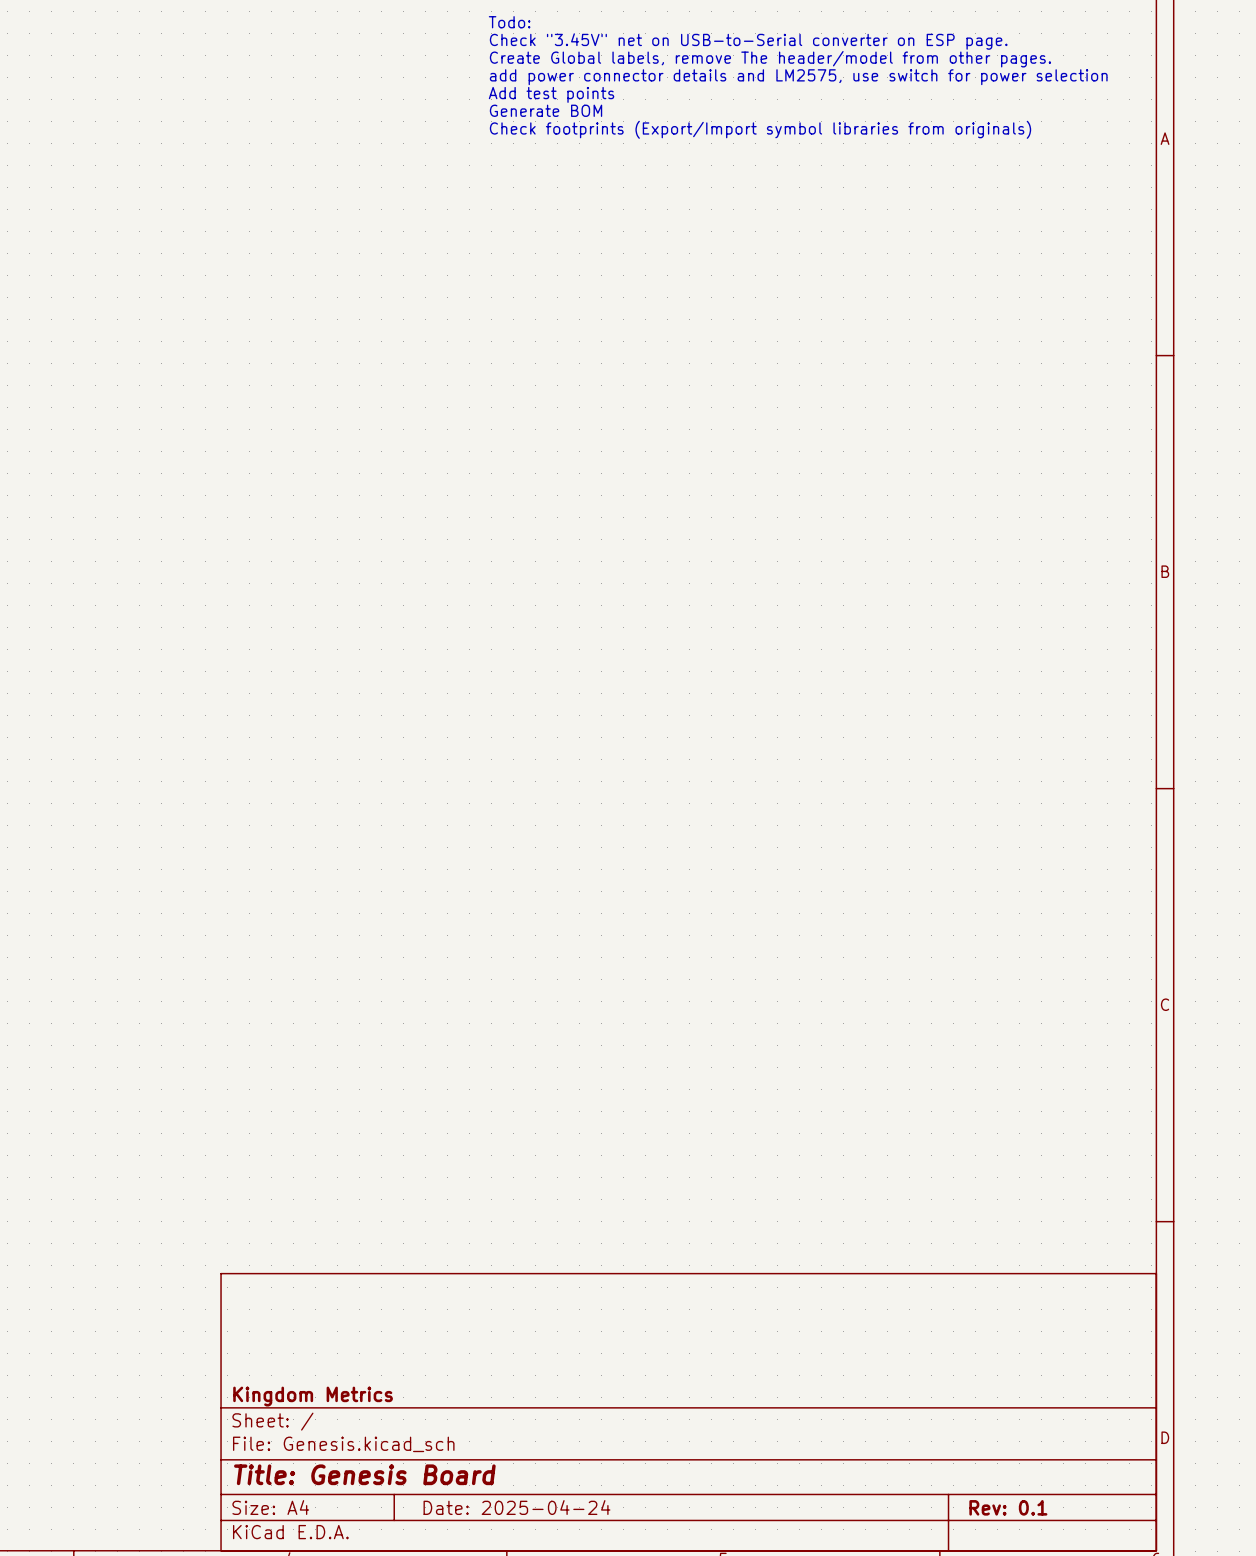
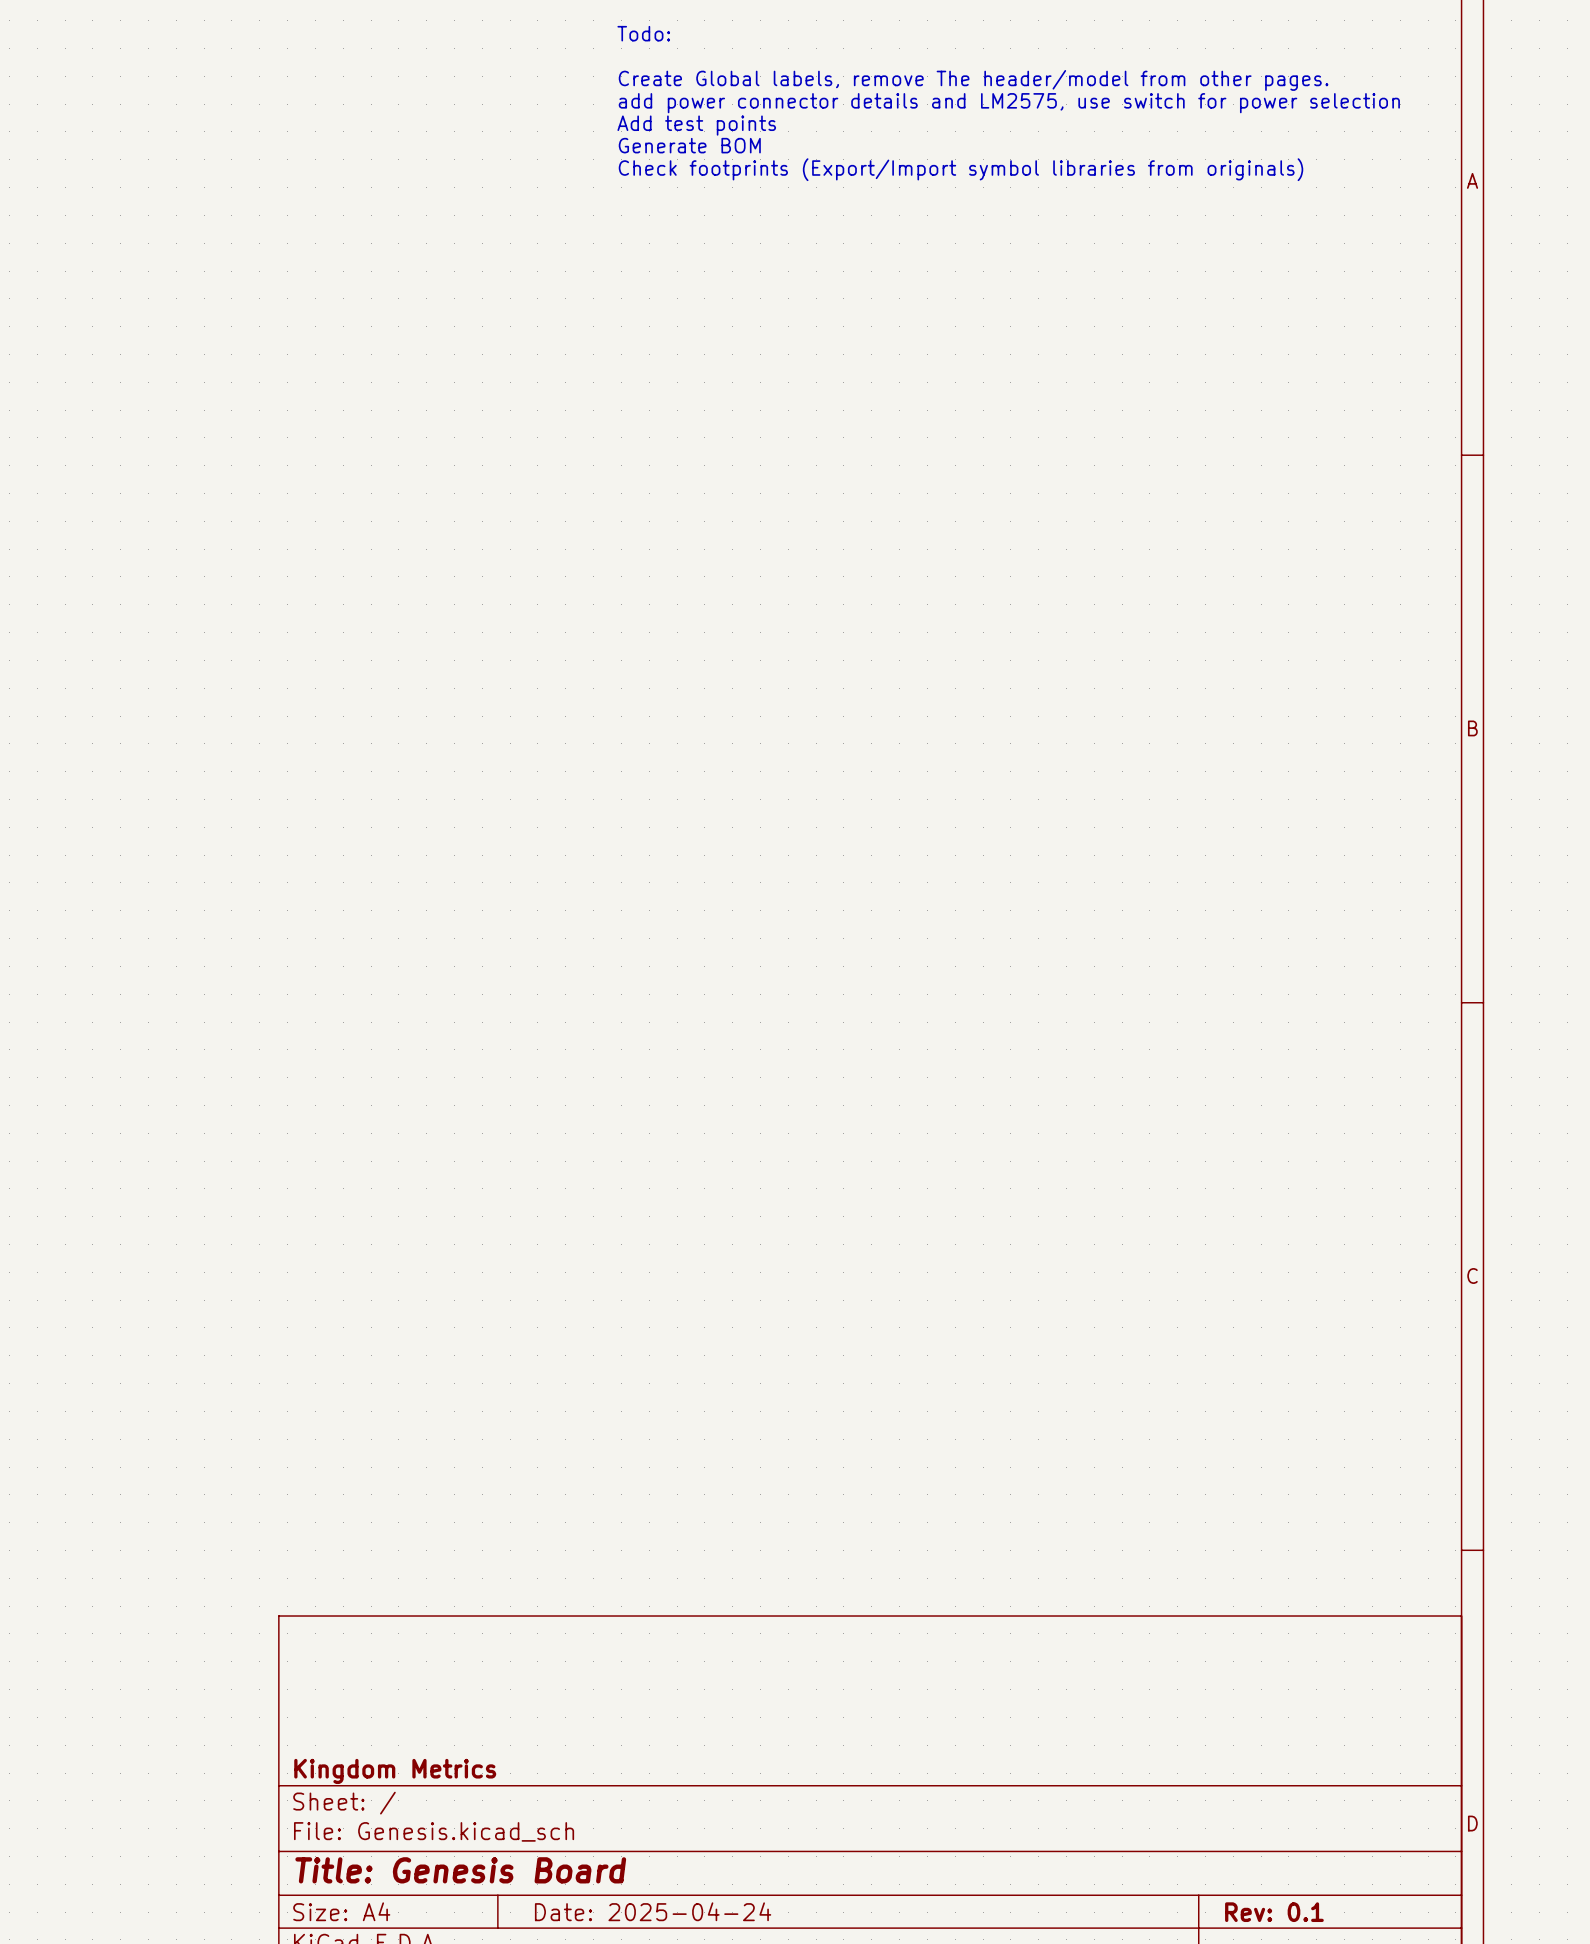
text: Check "3.45V" net on USB-to-Serial converter on ESP page. (748, 41) -> none

